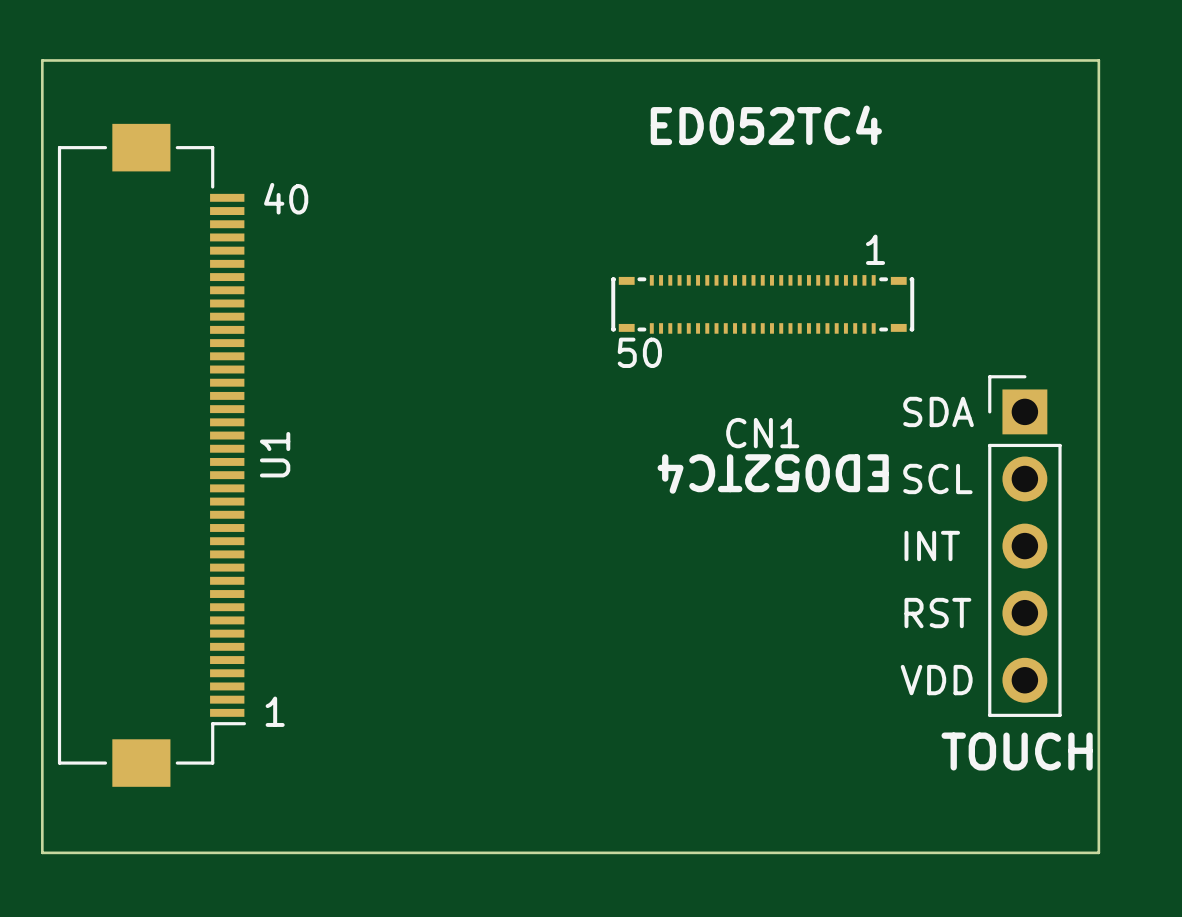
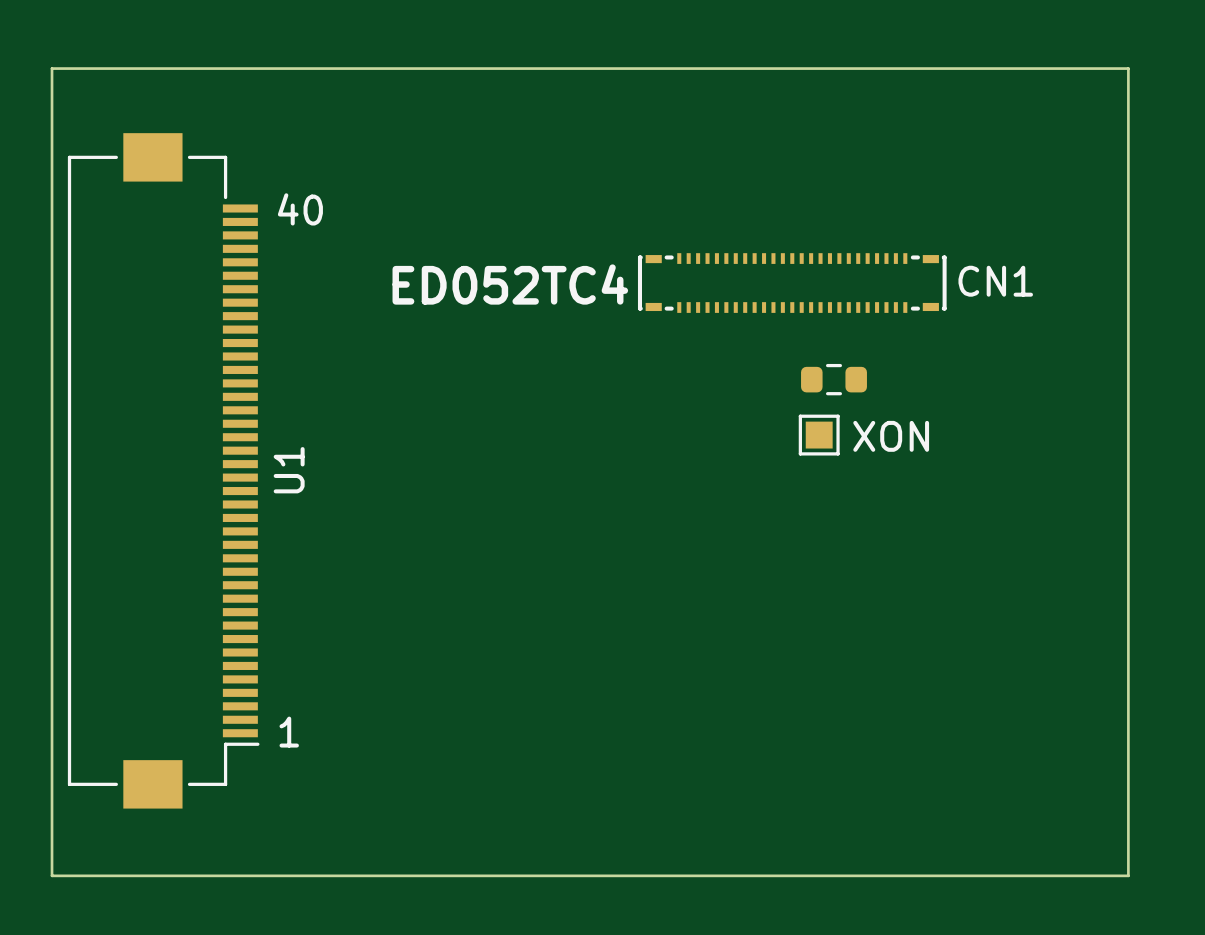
text: ED052TC4 (766, 125) -> none
text: 1 (875, 249) -> none
text: none -> ED052TC4 (510, 284)
CN1 position: (762, 304) -> (792, 283)
text: 50 (639, 352) -> none
part: none -> (834, 379)
text: SDA (938, 411) -> none
part: none -> (819, 435)
text: none -> XON (891, 436)
CN1 name position: CN1 (762, 433) -> CN1 (995, 281)
text: ED052TC4 (773, 473) -> none
text: SCL (937, 478) -> none
text: INT (932, 546) -> none
part: (1024, 546) -> none
text: RST (937, 613) -> none
text: VDD (936, 680) -> none
text: TOUCH (1017, 751) -> none

